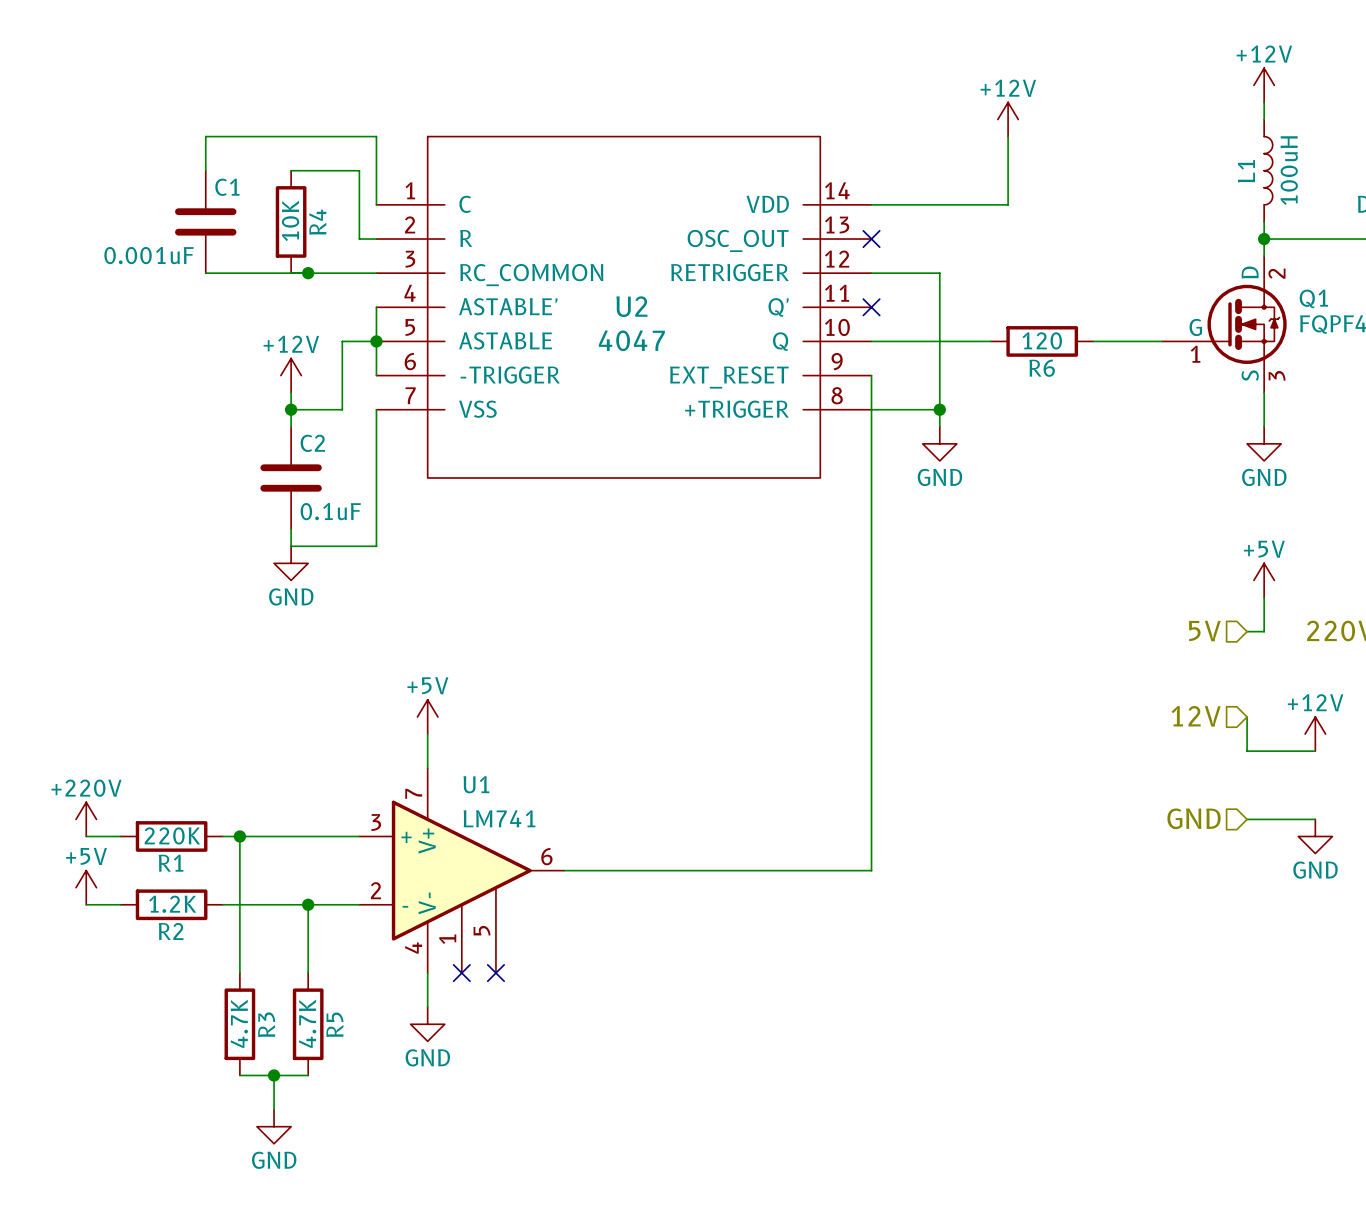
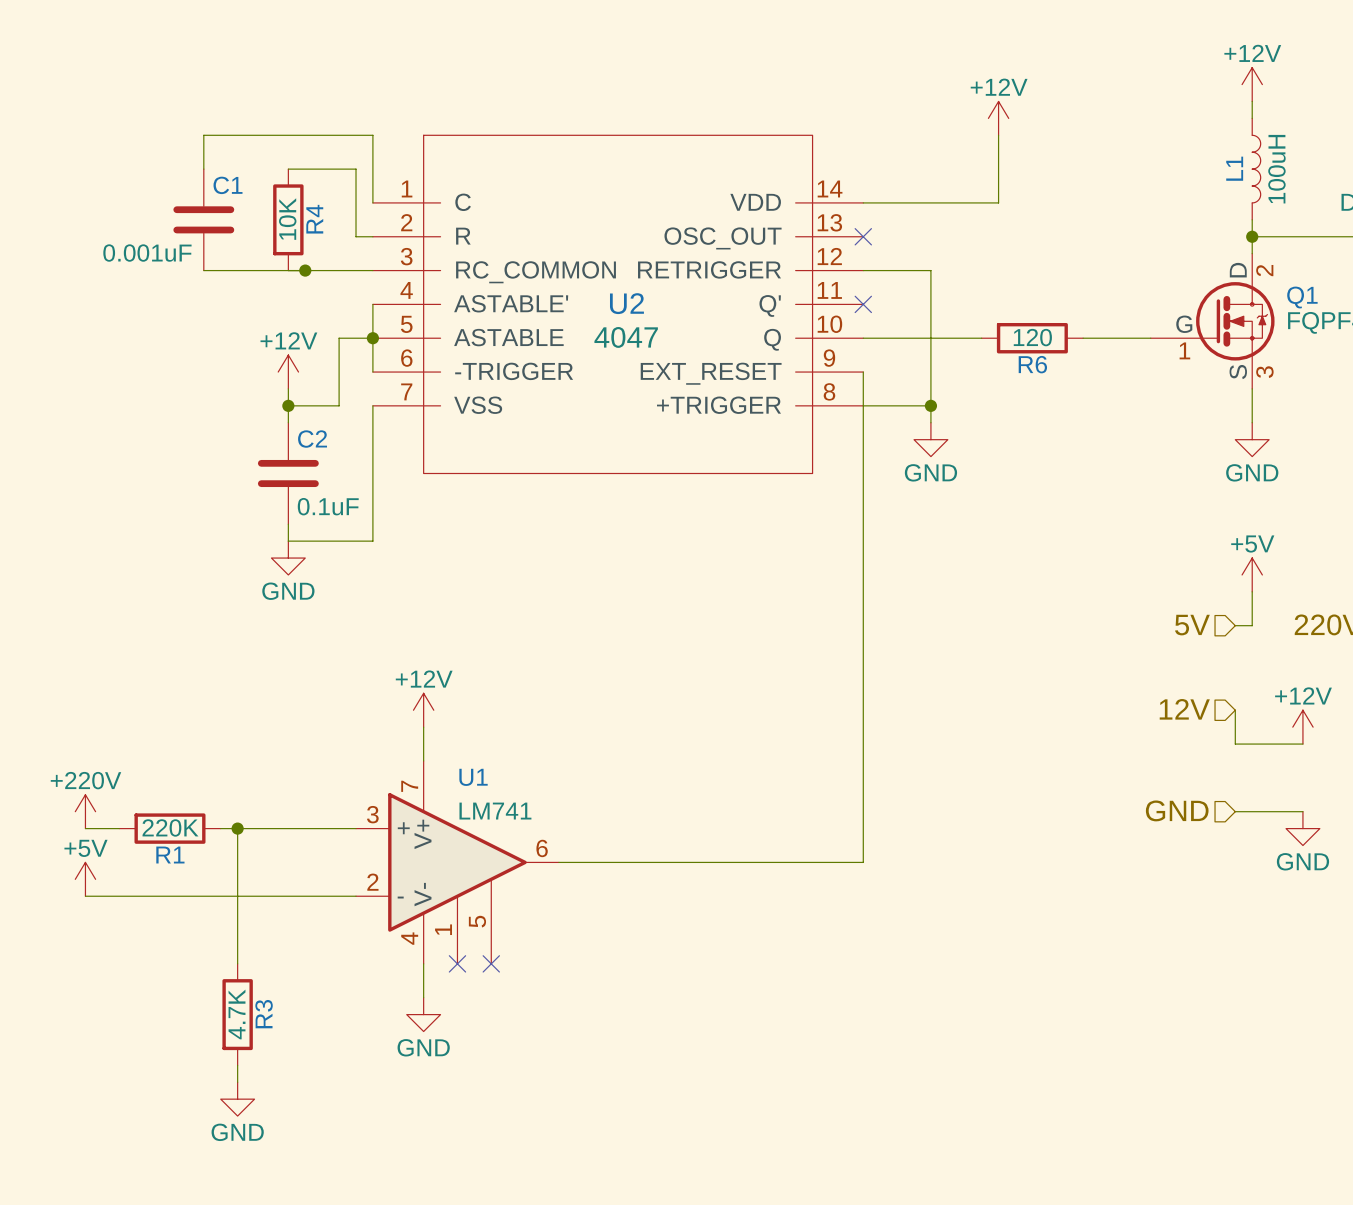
power symbol: +5V (427, 716) -> +12V (423, 710)
wire: none -> (119, 896) (220, 896)
R2: 1.2K (171, 904) -> none
wire: (308, 904) (308, 973) -> none
junction: (308, 904) -> none
R5: 4.7K (308, 1024) -> none
wire: (239, 1075) (308, 1075) -> (237, 1065) (237, 1082)
wire: (274, 1075) (274, 1109) -> none
junction: (274, 1075) -> none
power symbol position: GND (274, 1126) -> GND (237, 1099)

